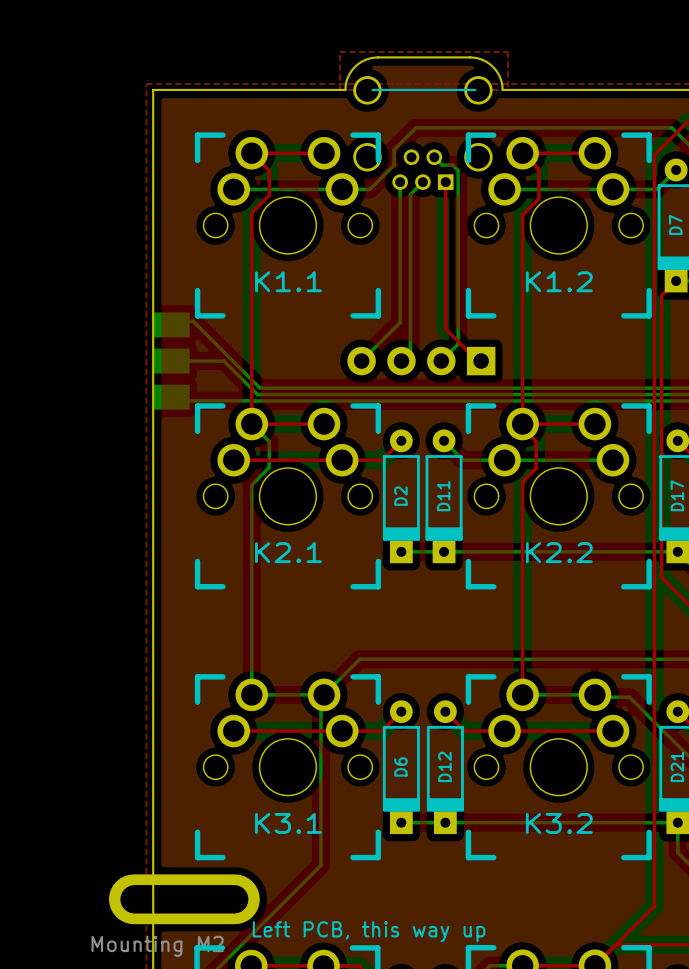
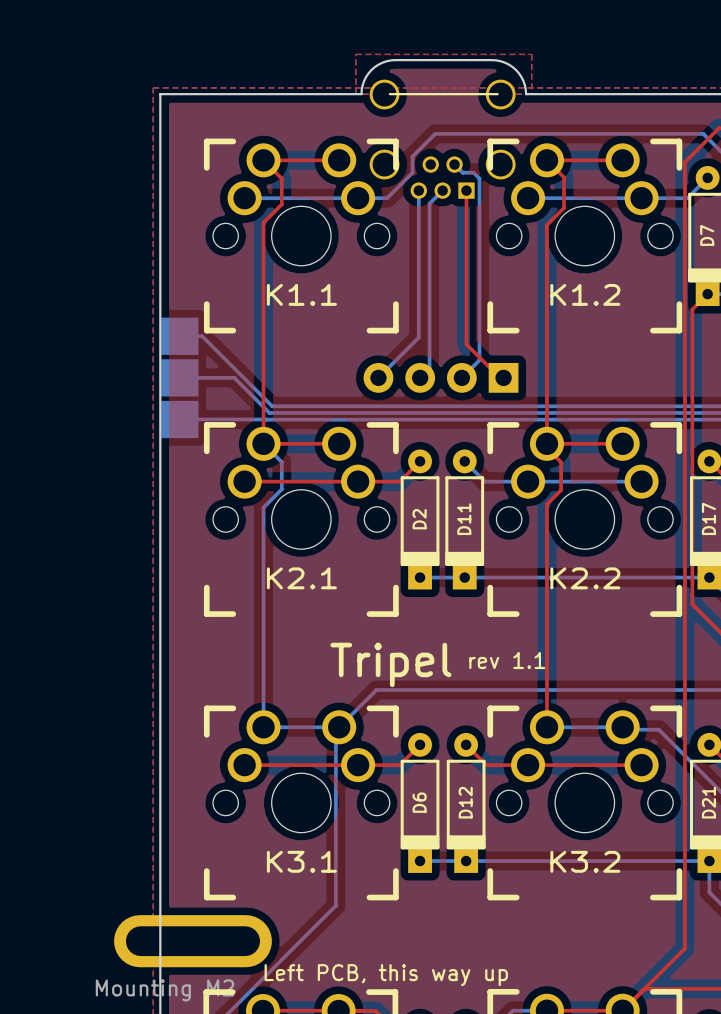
part footprint: [154, 312, 190, 410] -> [161, 317, 199, 439]
text: none -> rev 1.1 (507, 660)
text: none -> Tripel (390, 664)

